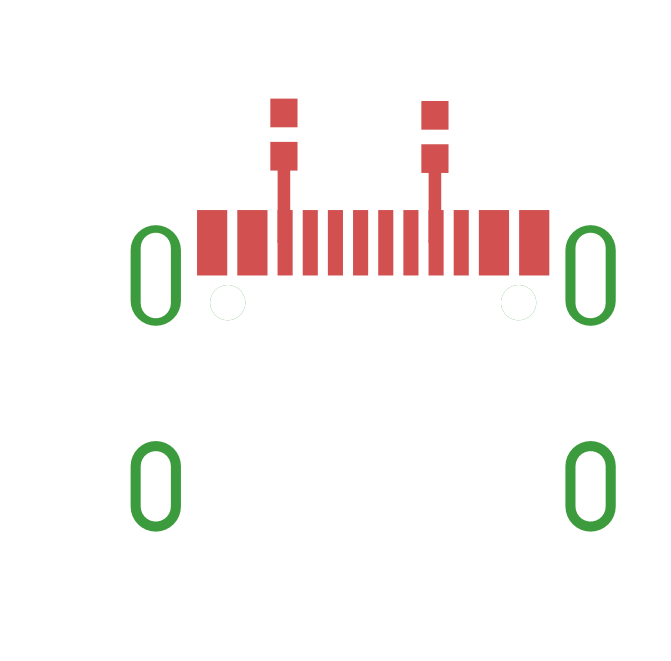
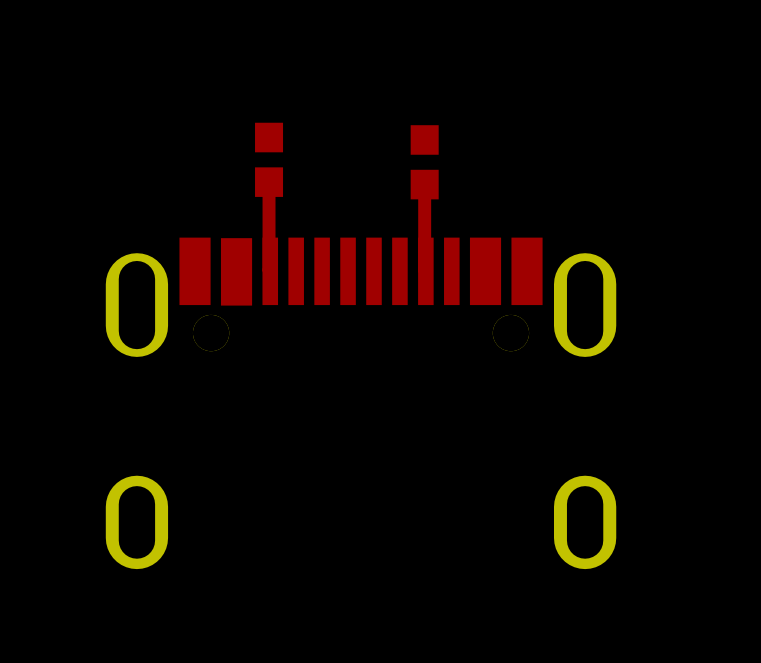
part footprint: [130, 210, 616, 532] -> [105, 237, 617, 570]

